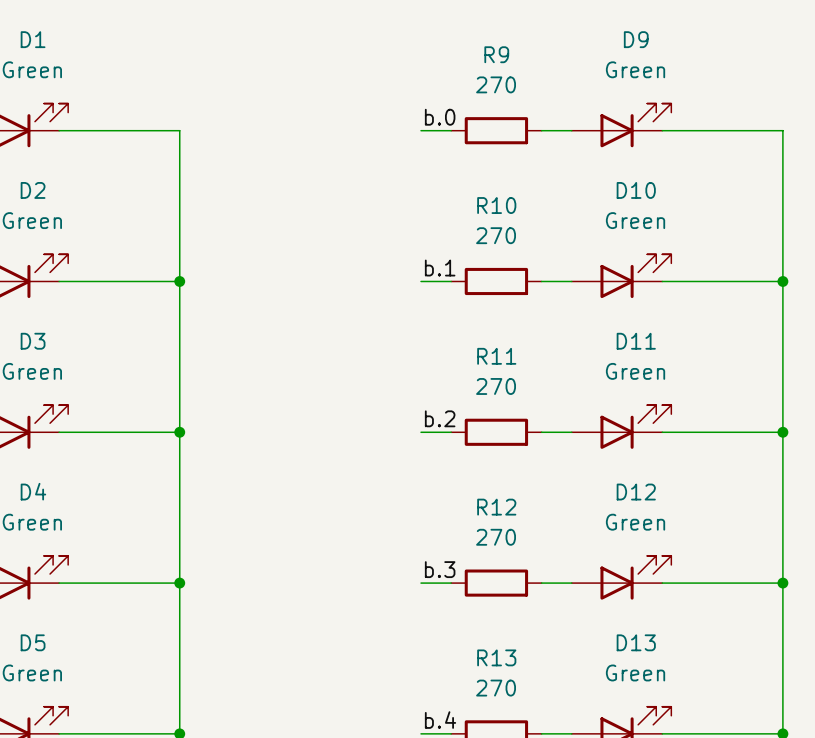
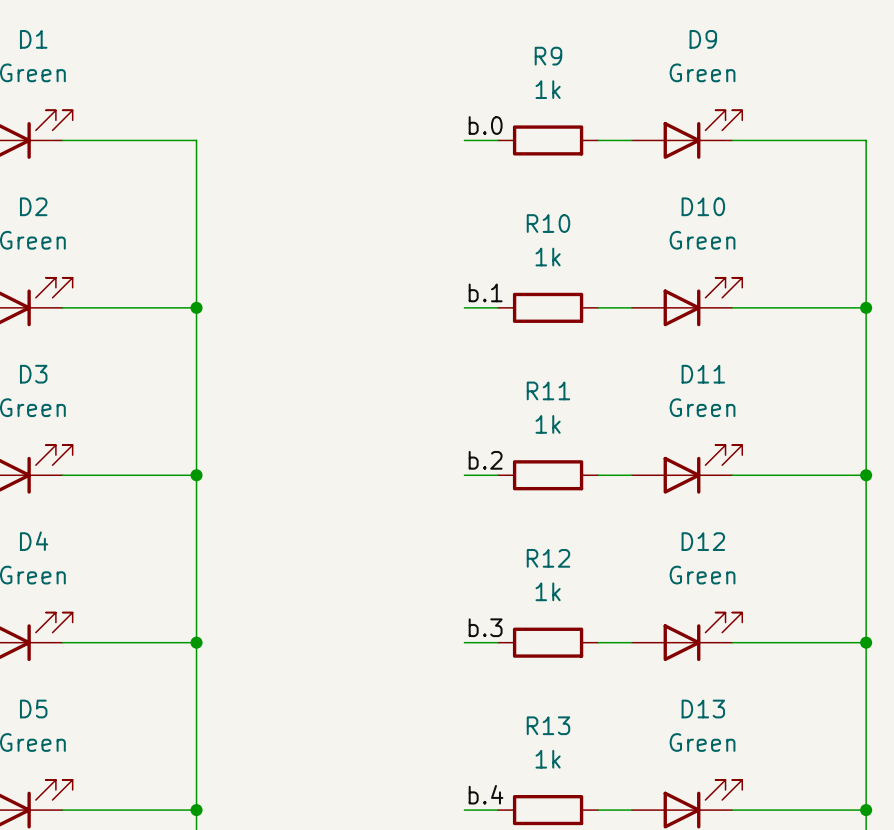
R9 value: 270 (496, 84) -> 1k (548, 89)
R10 value: 270 (496, 235) -> 1k (548, 257)
R11 value: 270 (496, 386) -> 1k (548, 424)
R12 value: 270 (496, 537) -> 1k (548, 591)
R13 value: 270 (496, 688) -> 1k (548, 759)

